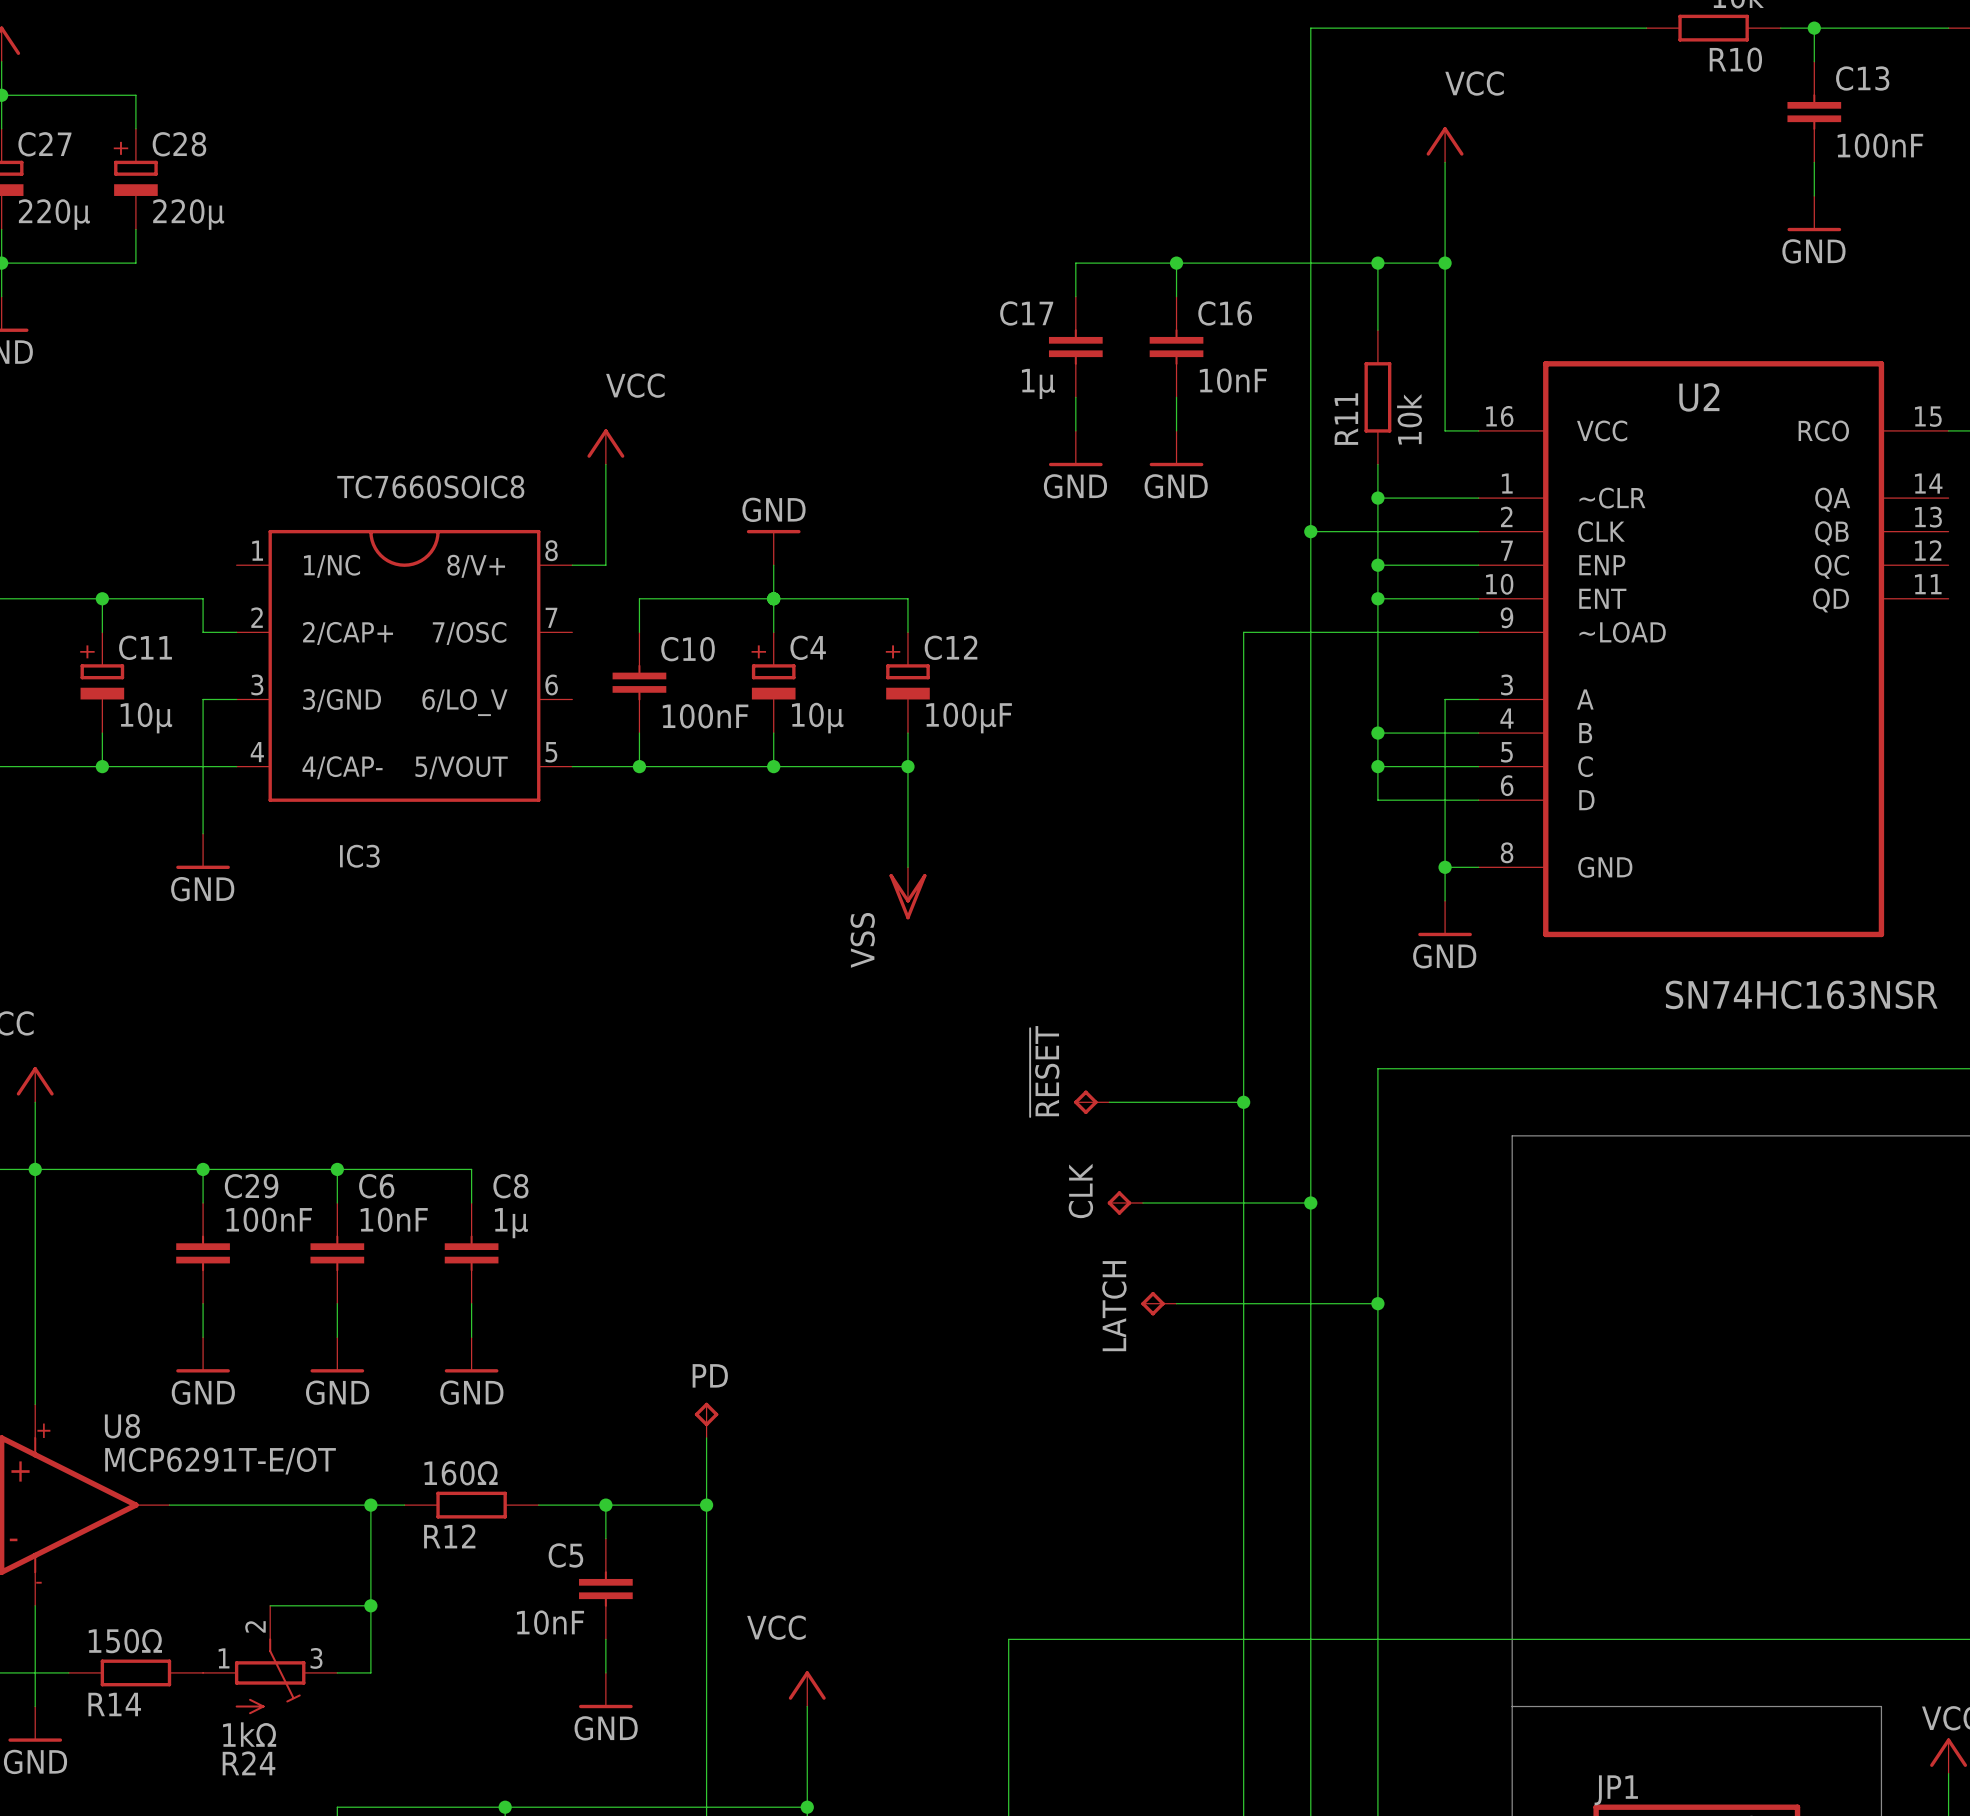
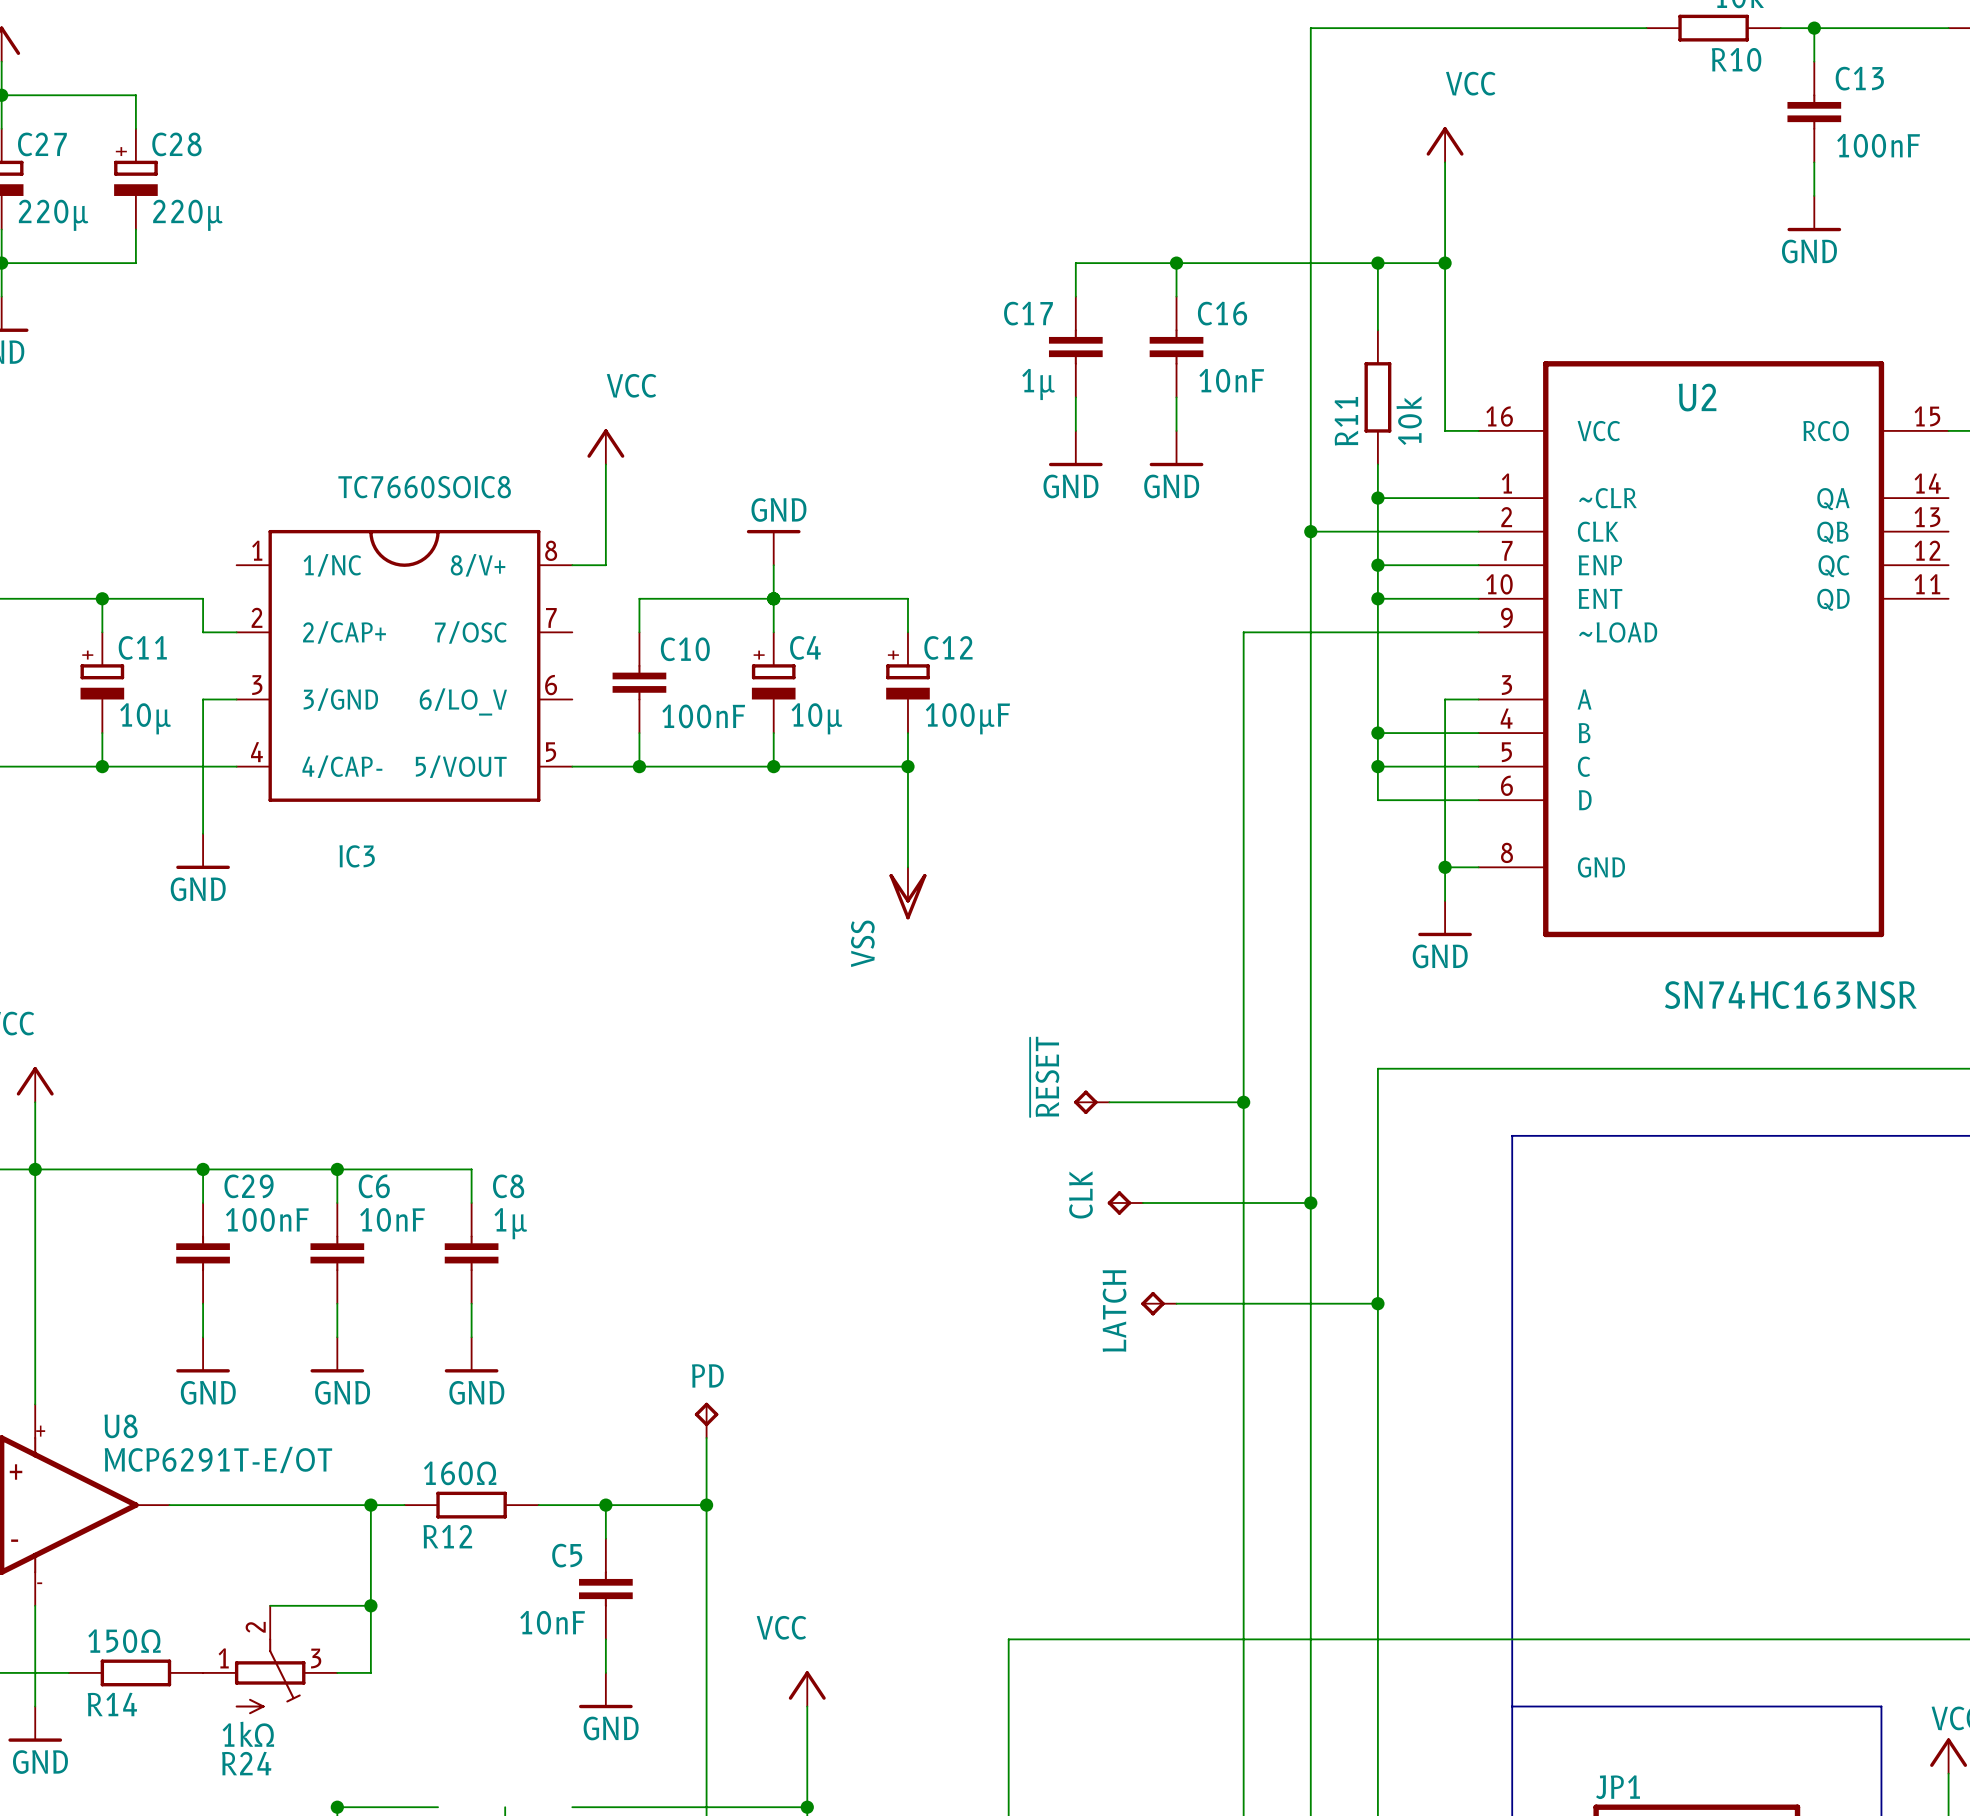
junction: none -> (337, 1807)
wire: (438, 1807) (572, 1807) -> none
junction: (505, 1807) -> none

